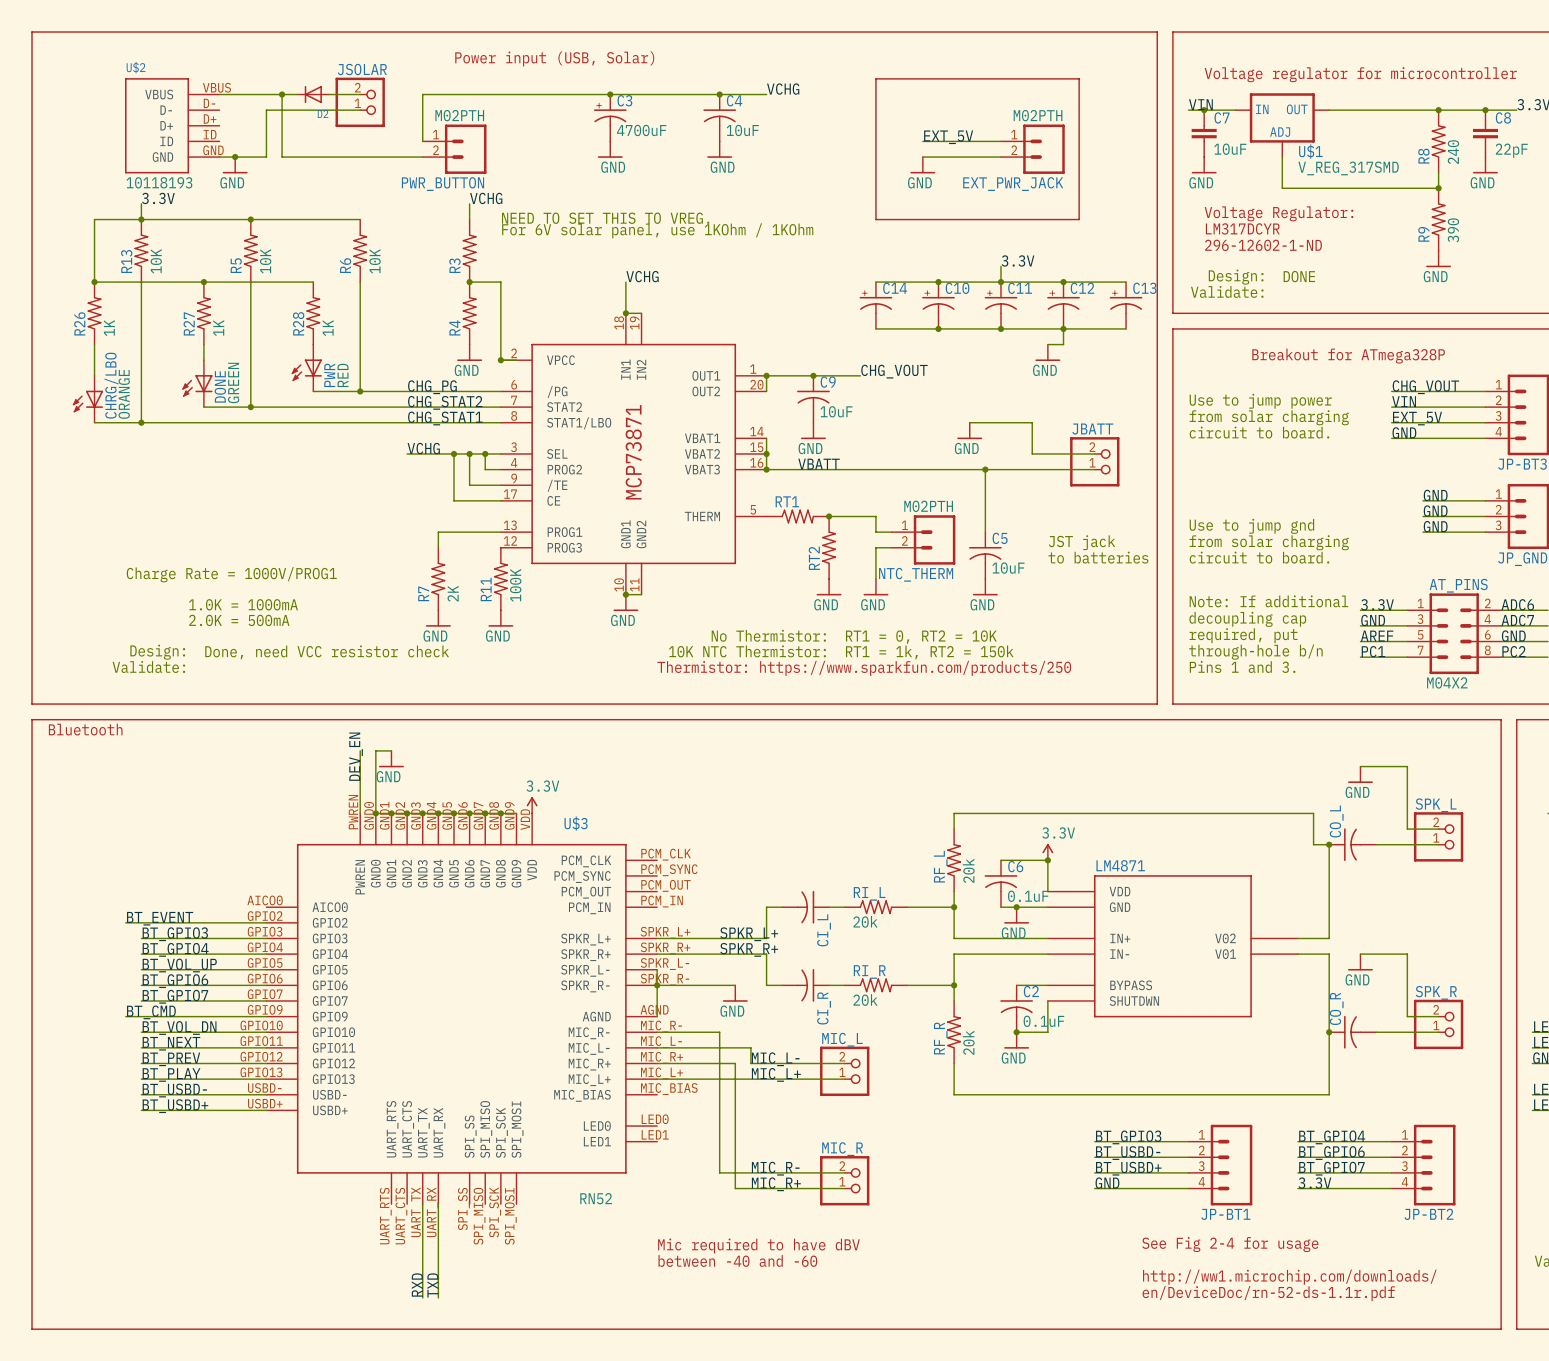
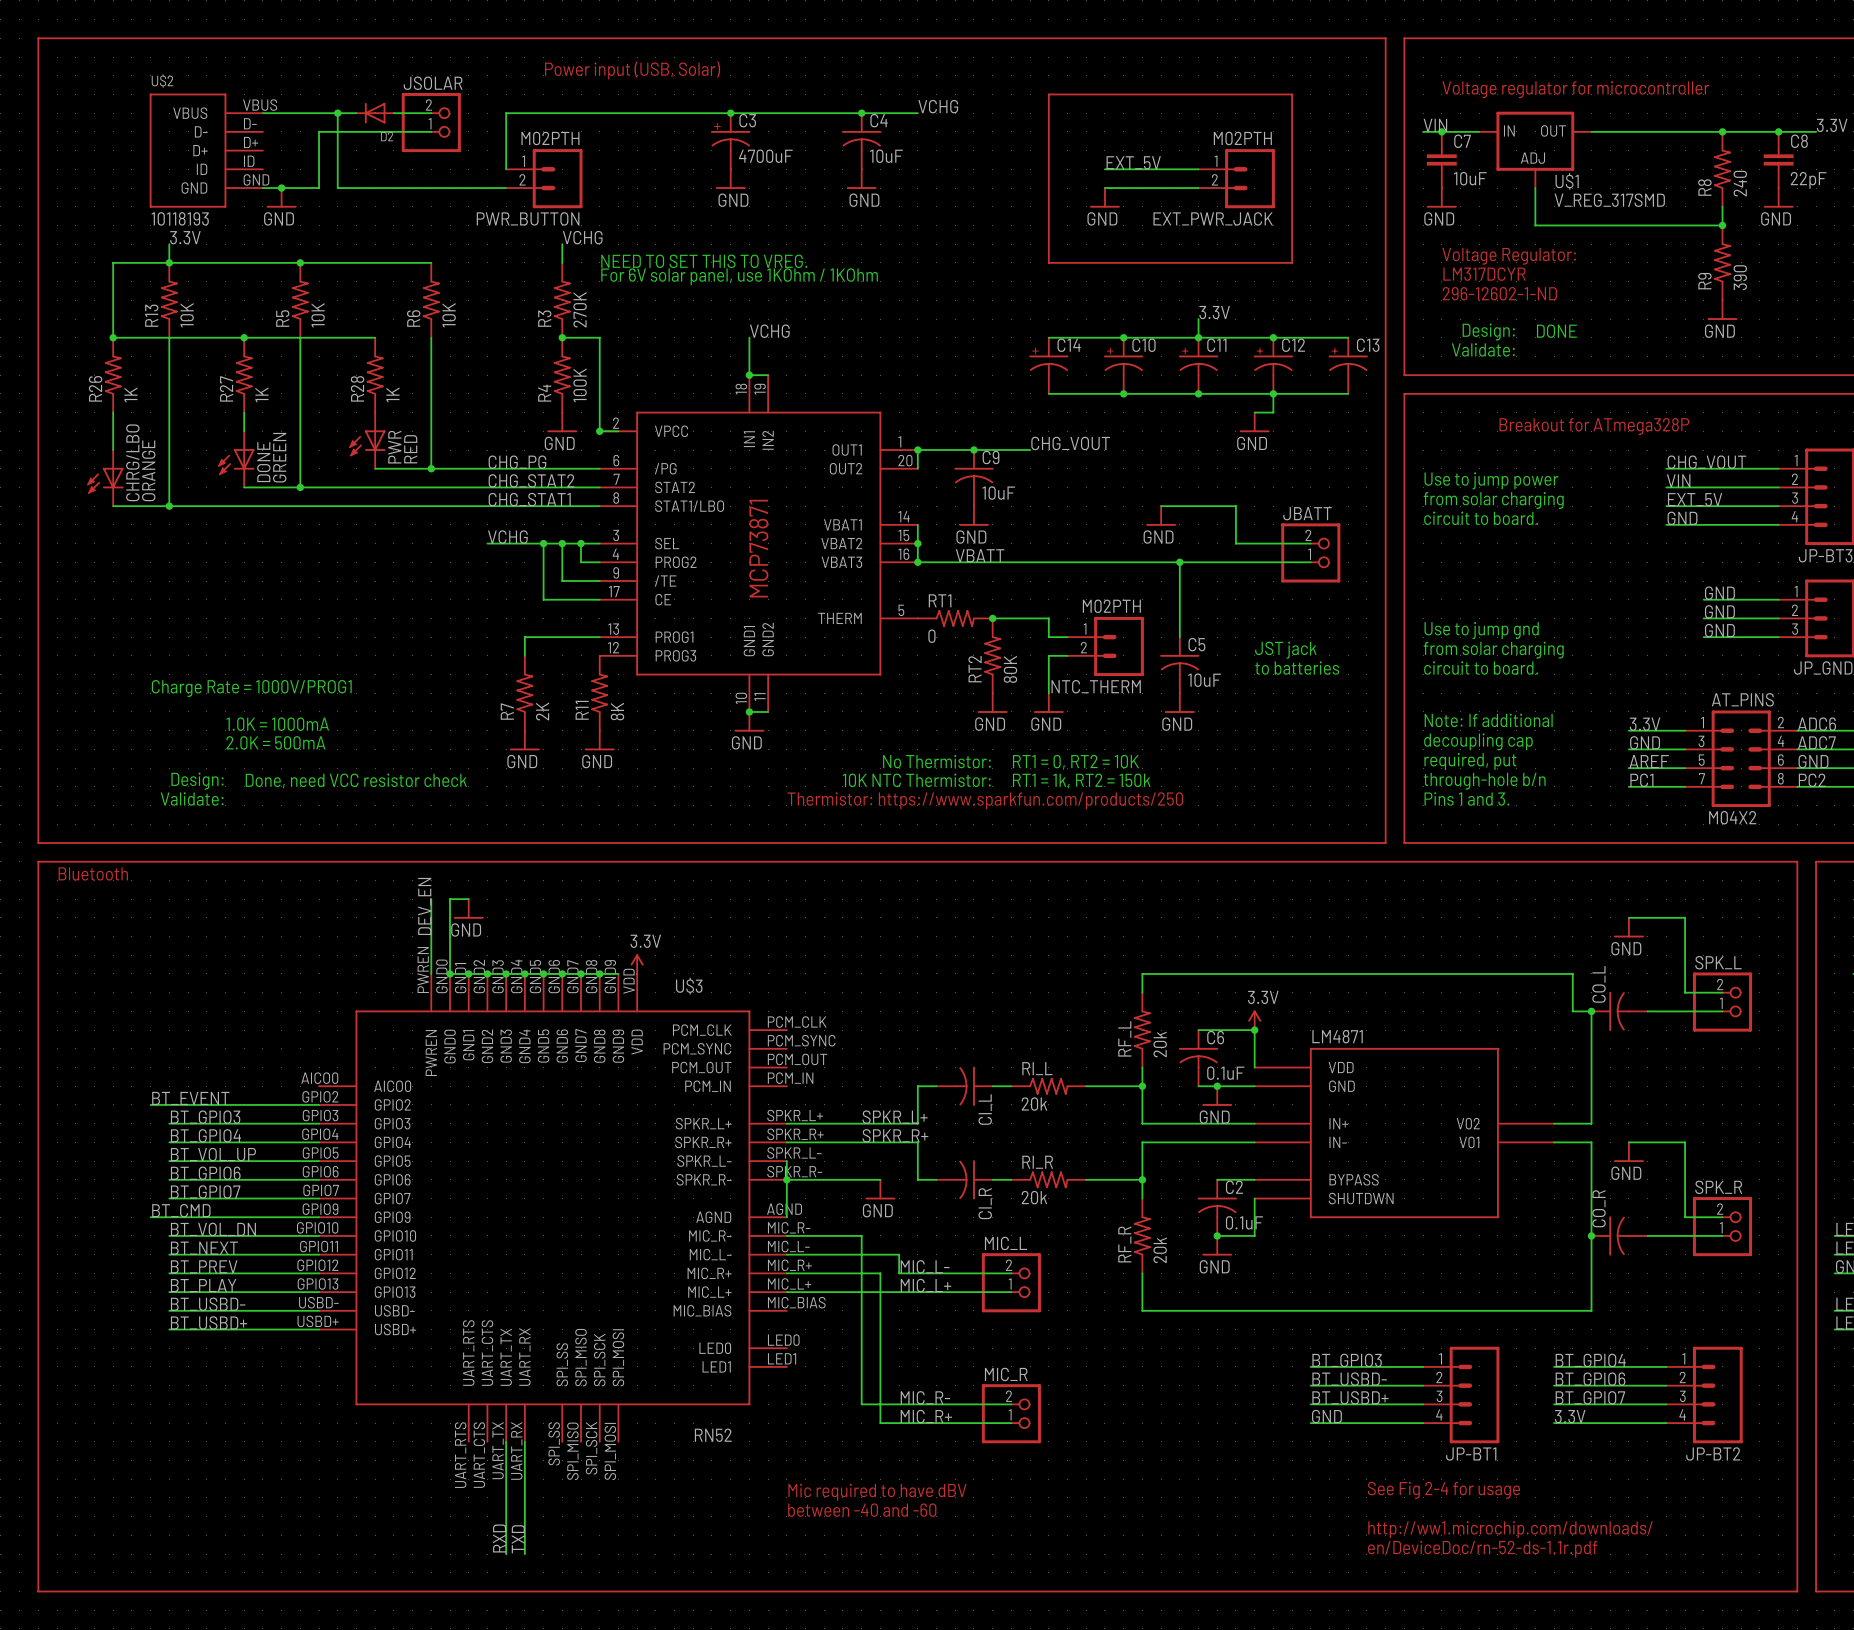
R3 value: none -> 270K (580, 309)
R4 value: none -> 100K (580, 385)
RT1 value: none -> 0 (931, 636)
RT2 value: none -> 80K (1010, 669)
R11 value: 100K (515, 585) -> 8K (617, 711)

